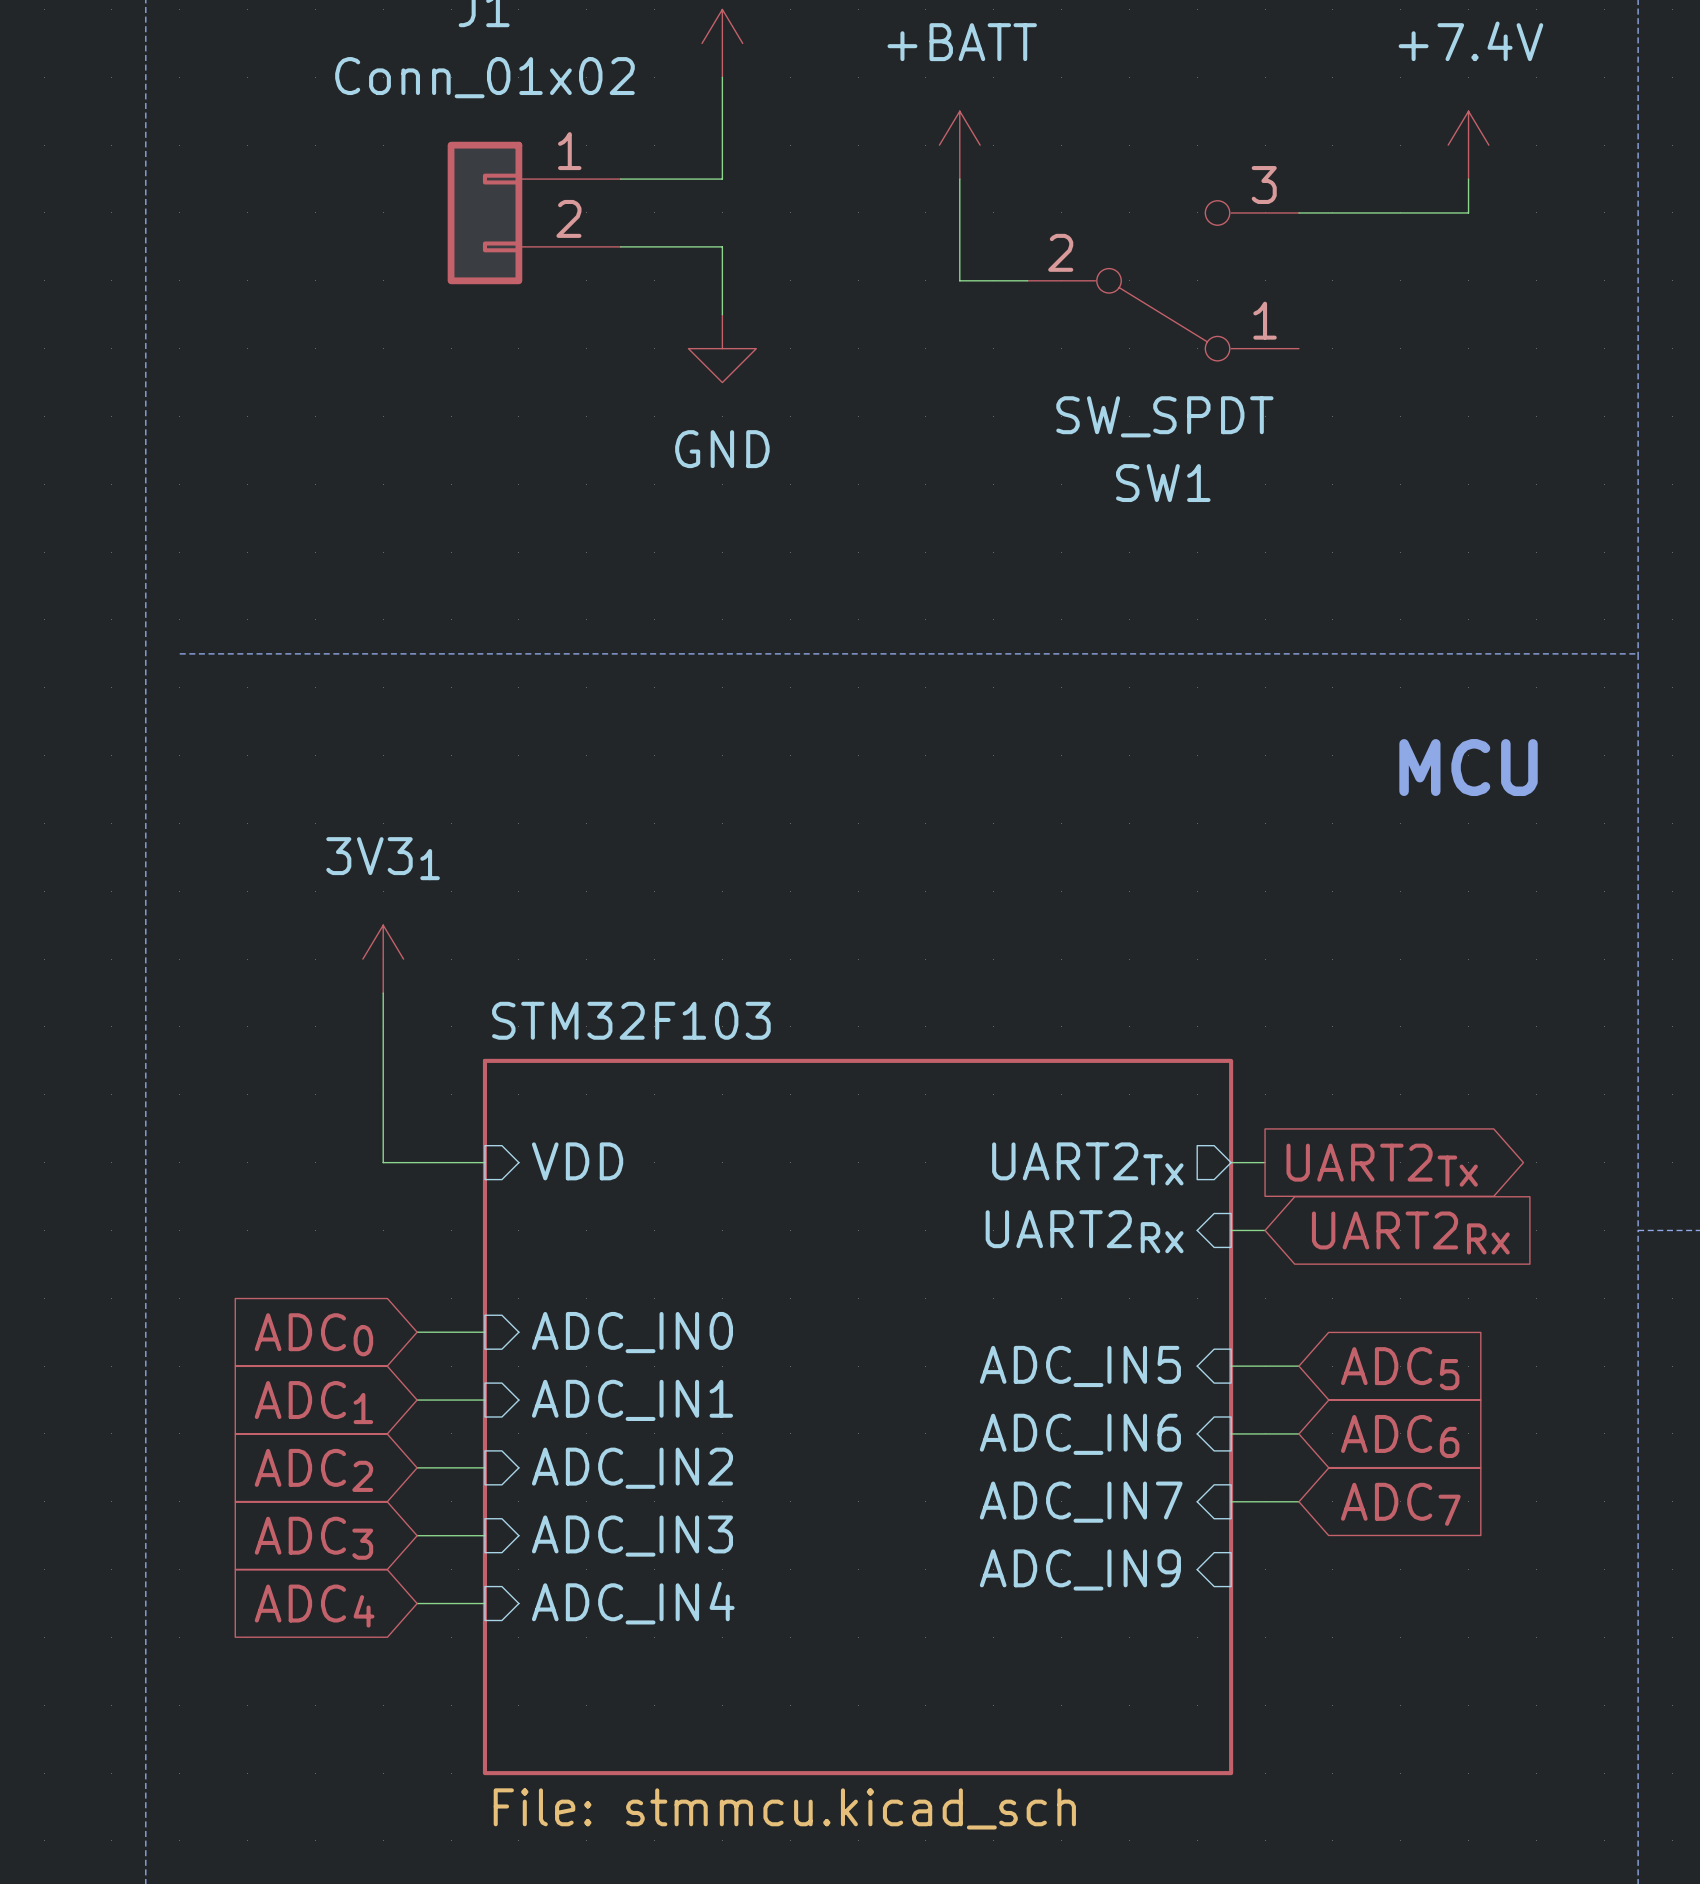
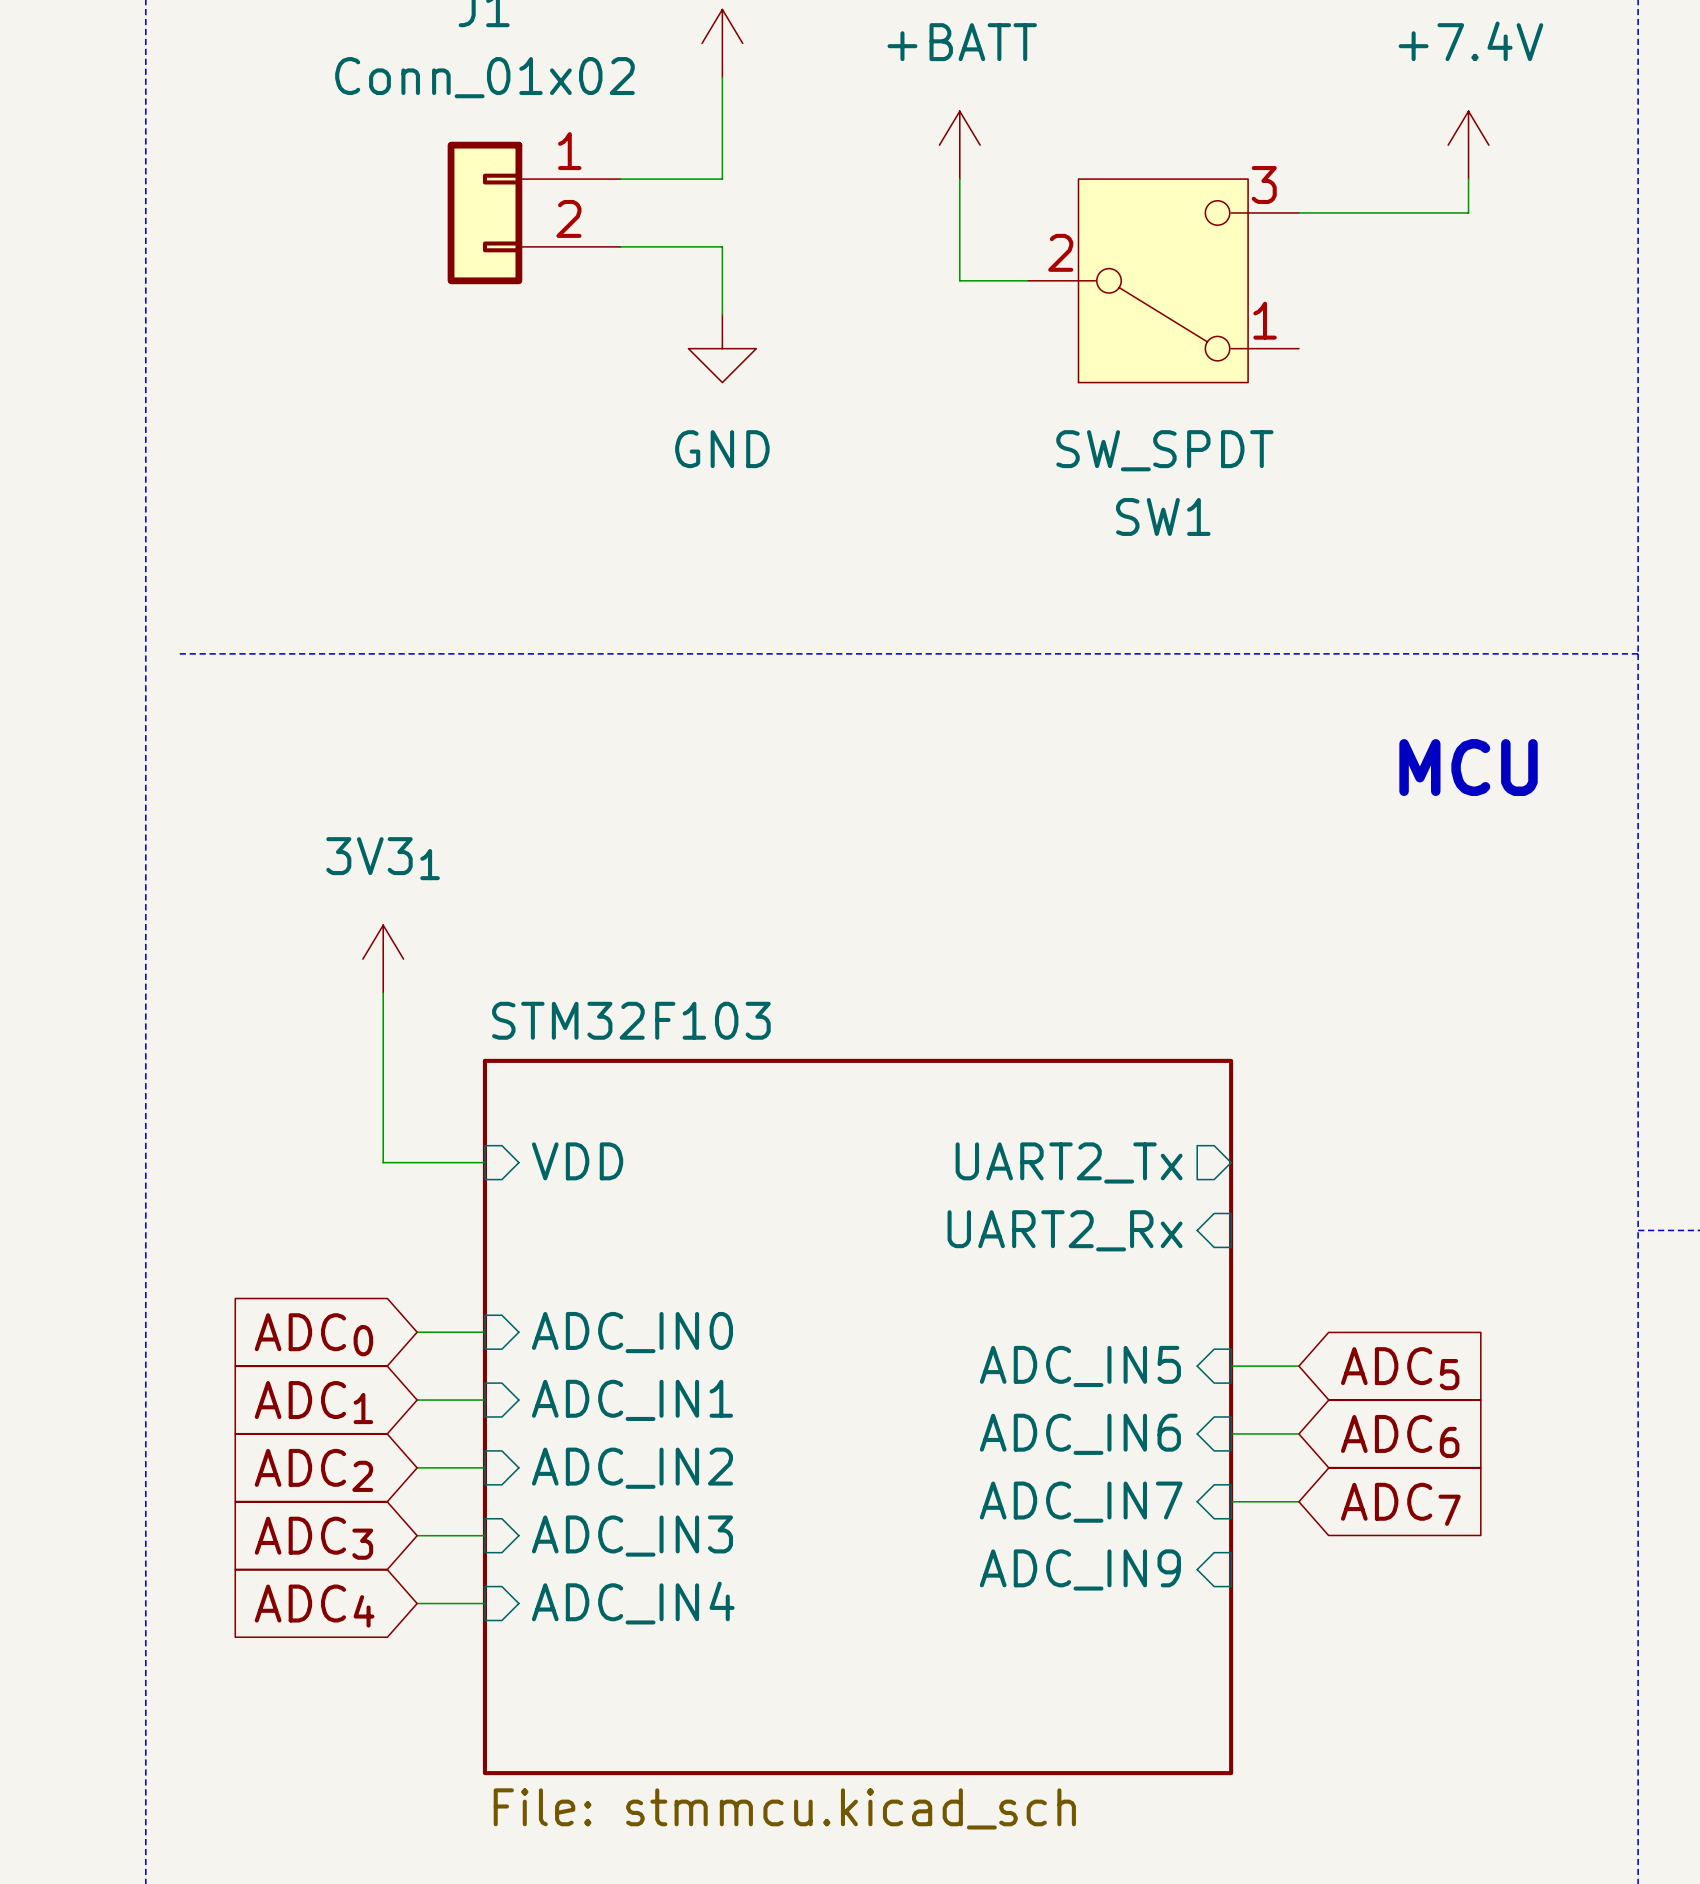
SW1 symbol: [1027, 200, 1299, 361] -> [1027, 179, 1299, 383]
wire: (1231, 1162) (1265, 1162) -> none
sheet pin: UART2Tx (1087, 1163) -> UART2_Tx (1069, 1162)
global label: UART2Tx (1382, 1165) -> none
wire: (1231, 1230) (1265, 1230) -> none
sheet pin: UART2Rx (1084, 1231) -> UART2_Rx (1065, 1230)
global label: UART2Rx (1410, 1233) -> none

